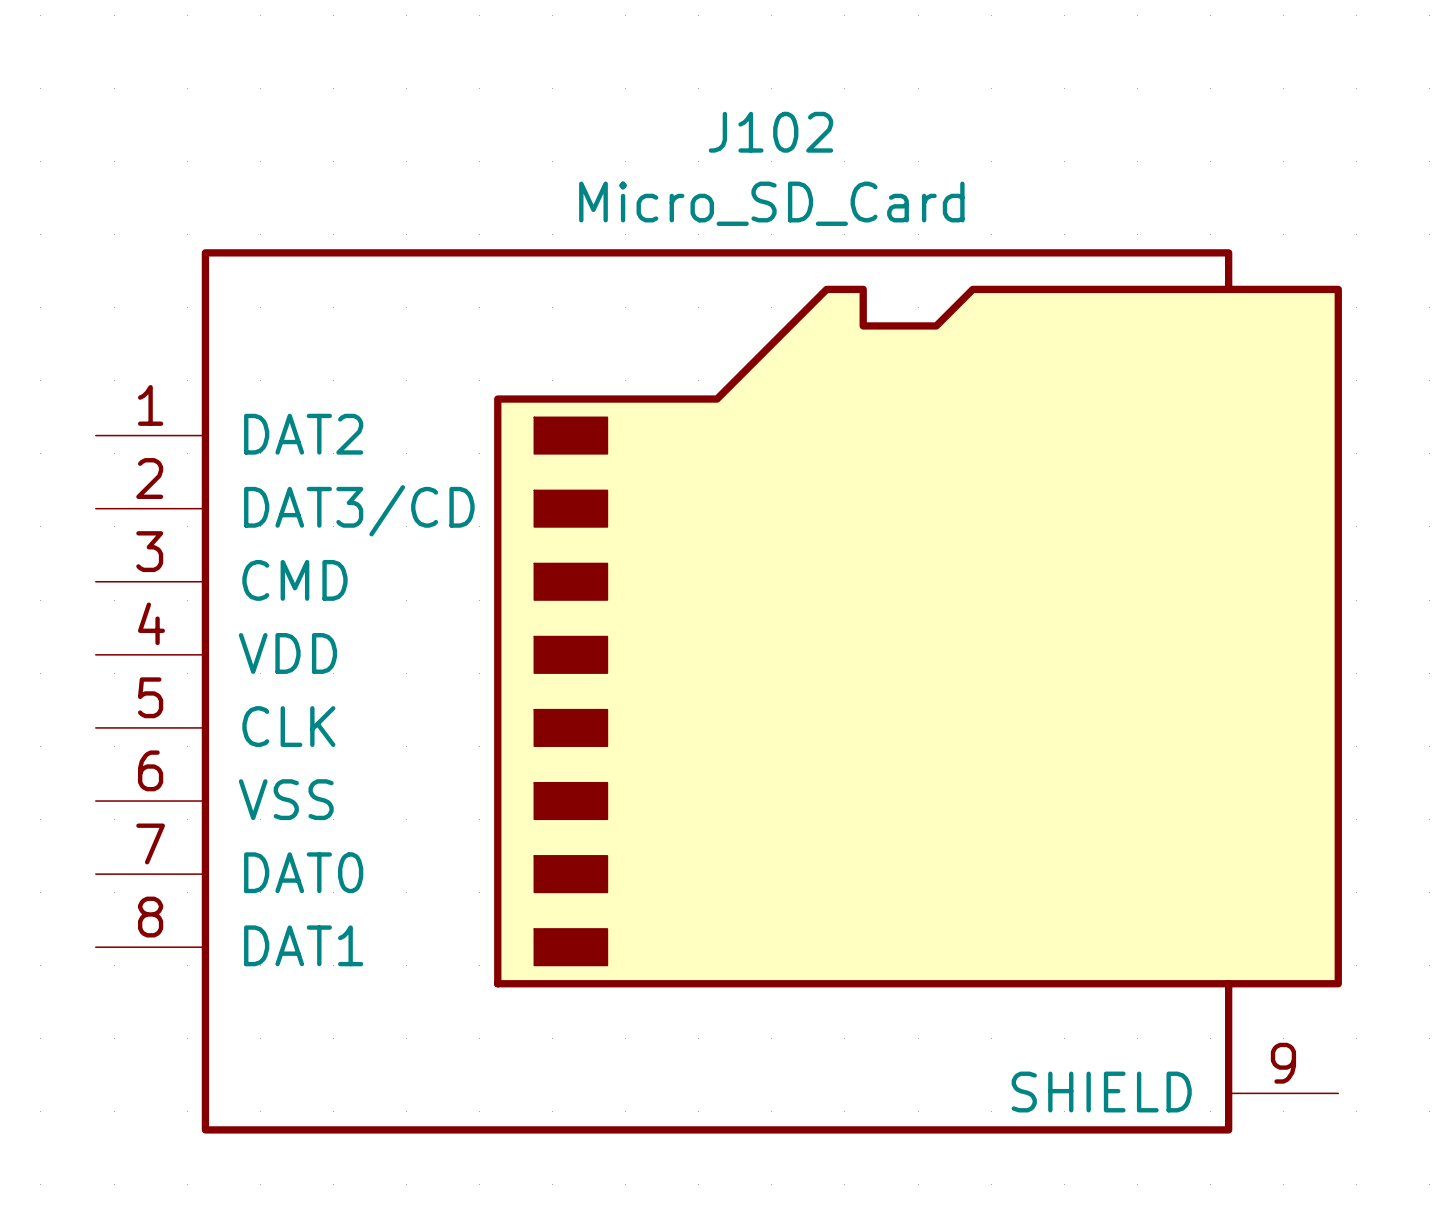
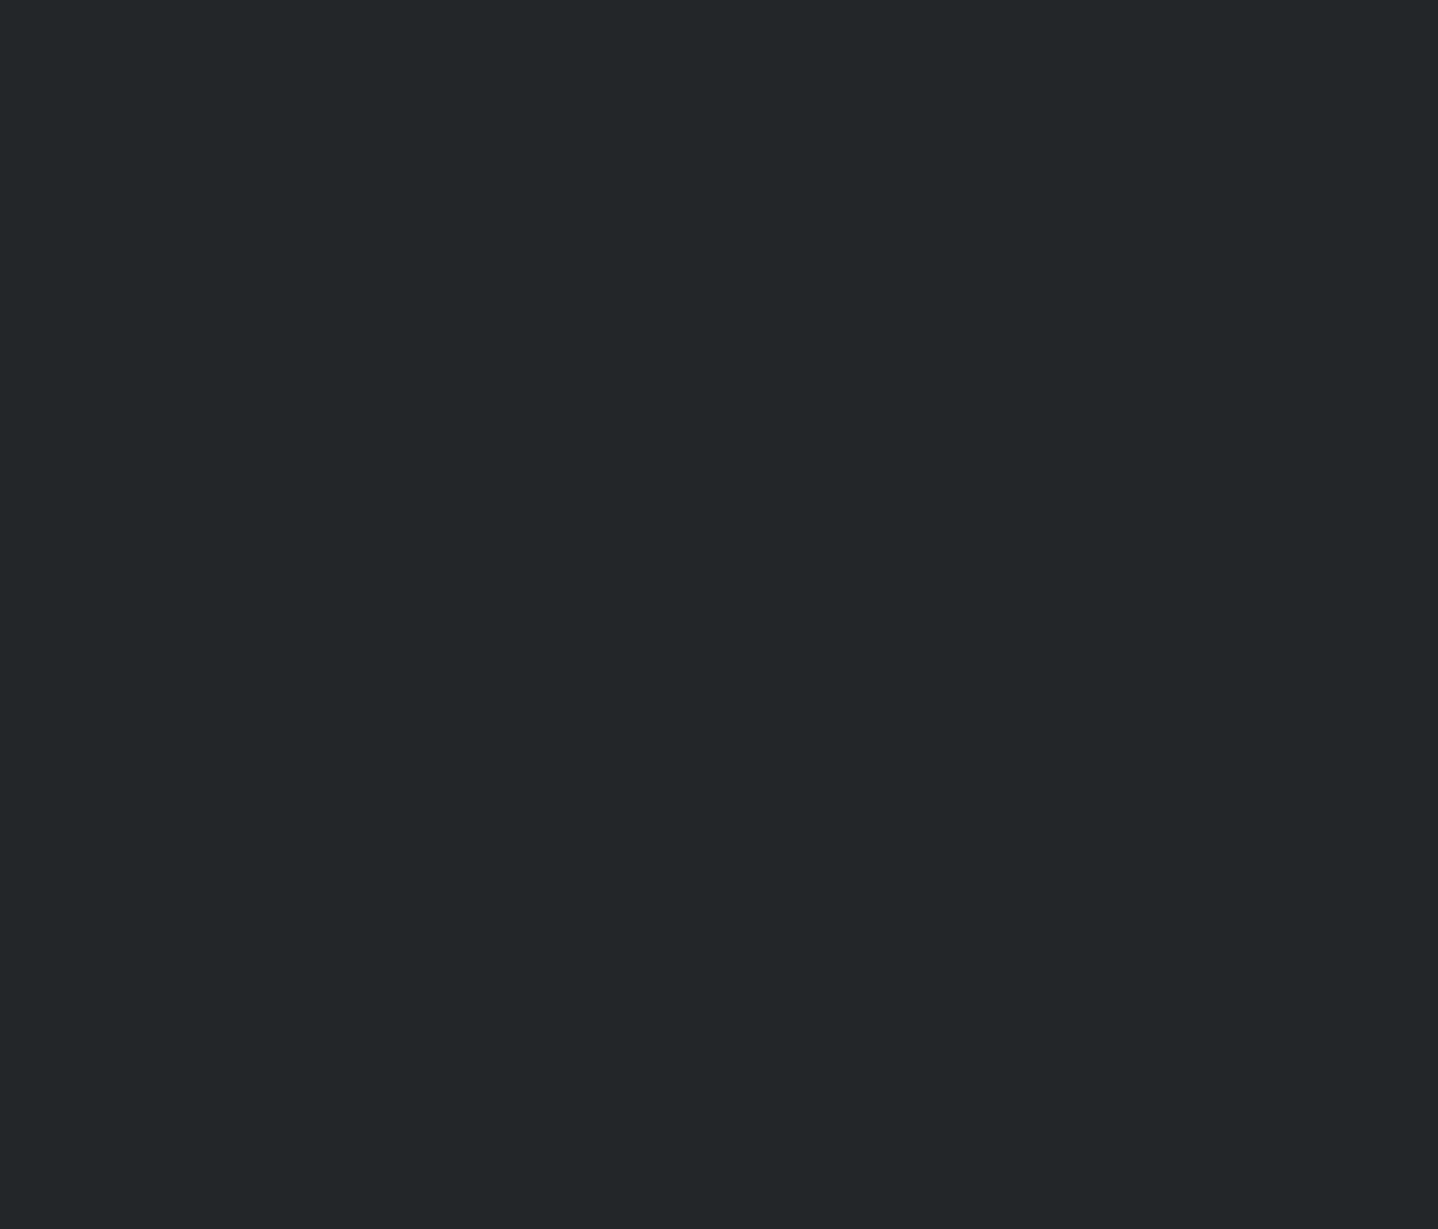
J102: Micro_SD_Card (718, 691) -> none

